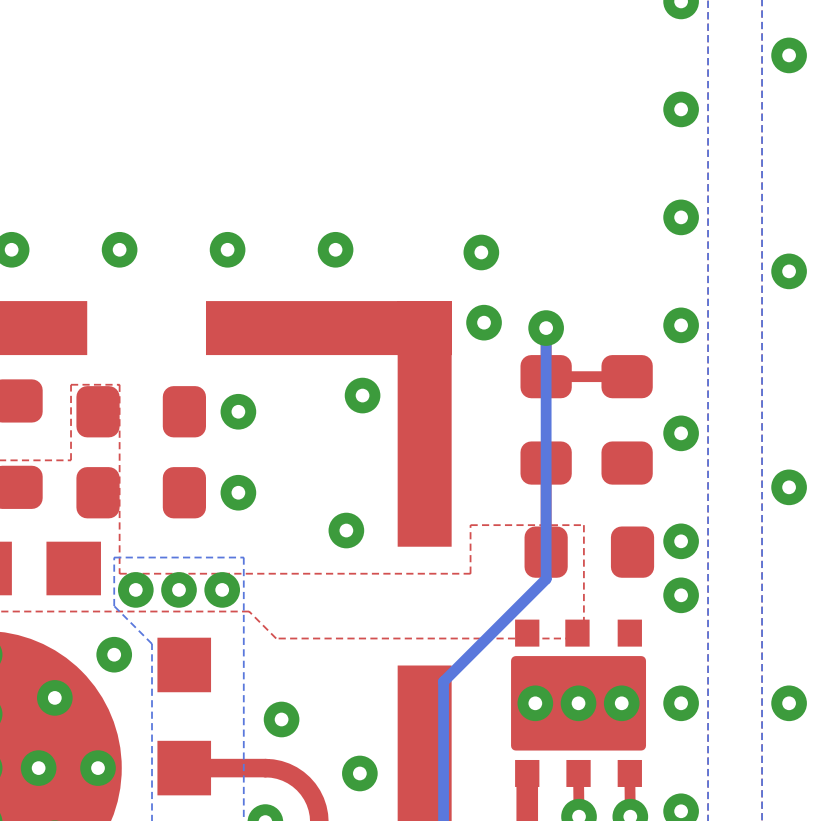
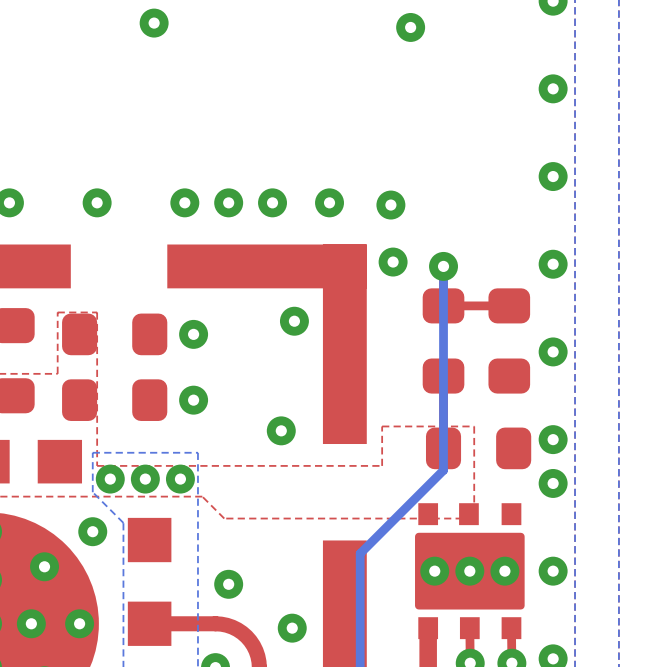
via: none -> (154, 23)
via: none -> (410, 27)
via: (789, 55) -> none
via: none -> (228, 202)
via: none -> (329, 202)
via: (789, 271) -> none
via: (789, 487) -> none
via: (789, 703) -> none

